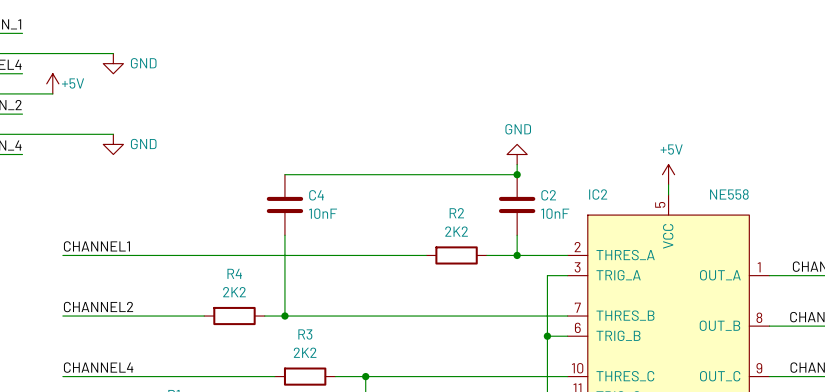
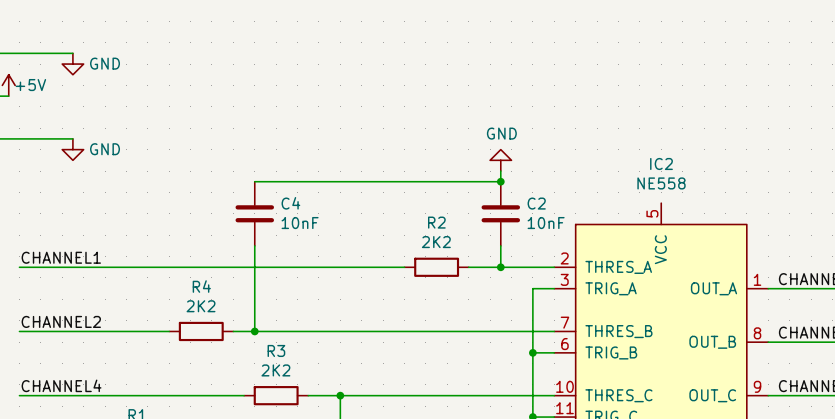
power symbol: +5V (668, 174) -> none
wire: (668, 184) (668, 194) -> none
IC2 name position: IC2 (598, 194) -> IC2 (661, 163)
IC2 value position: NE558 (729, 194) -> NE558 (661, 183)

